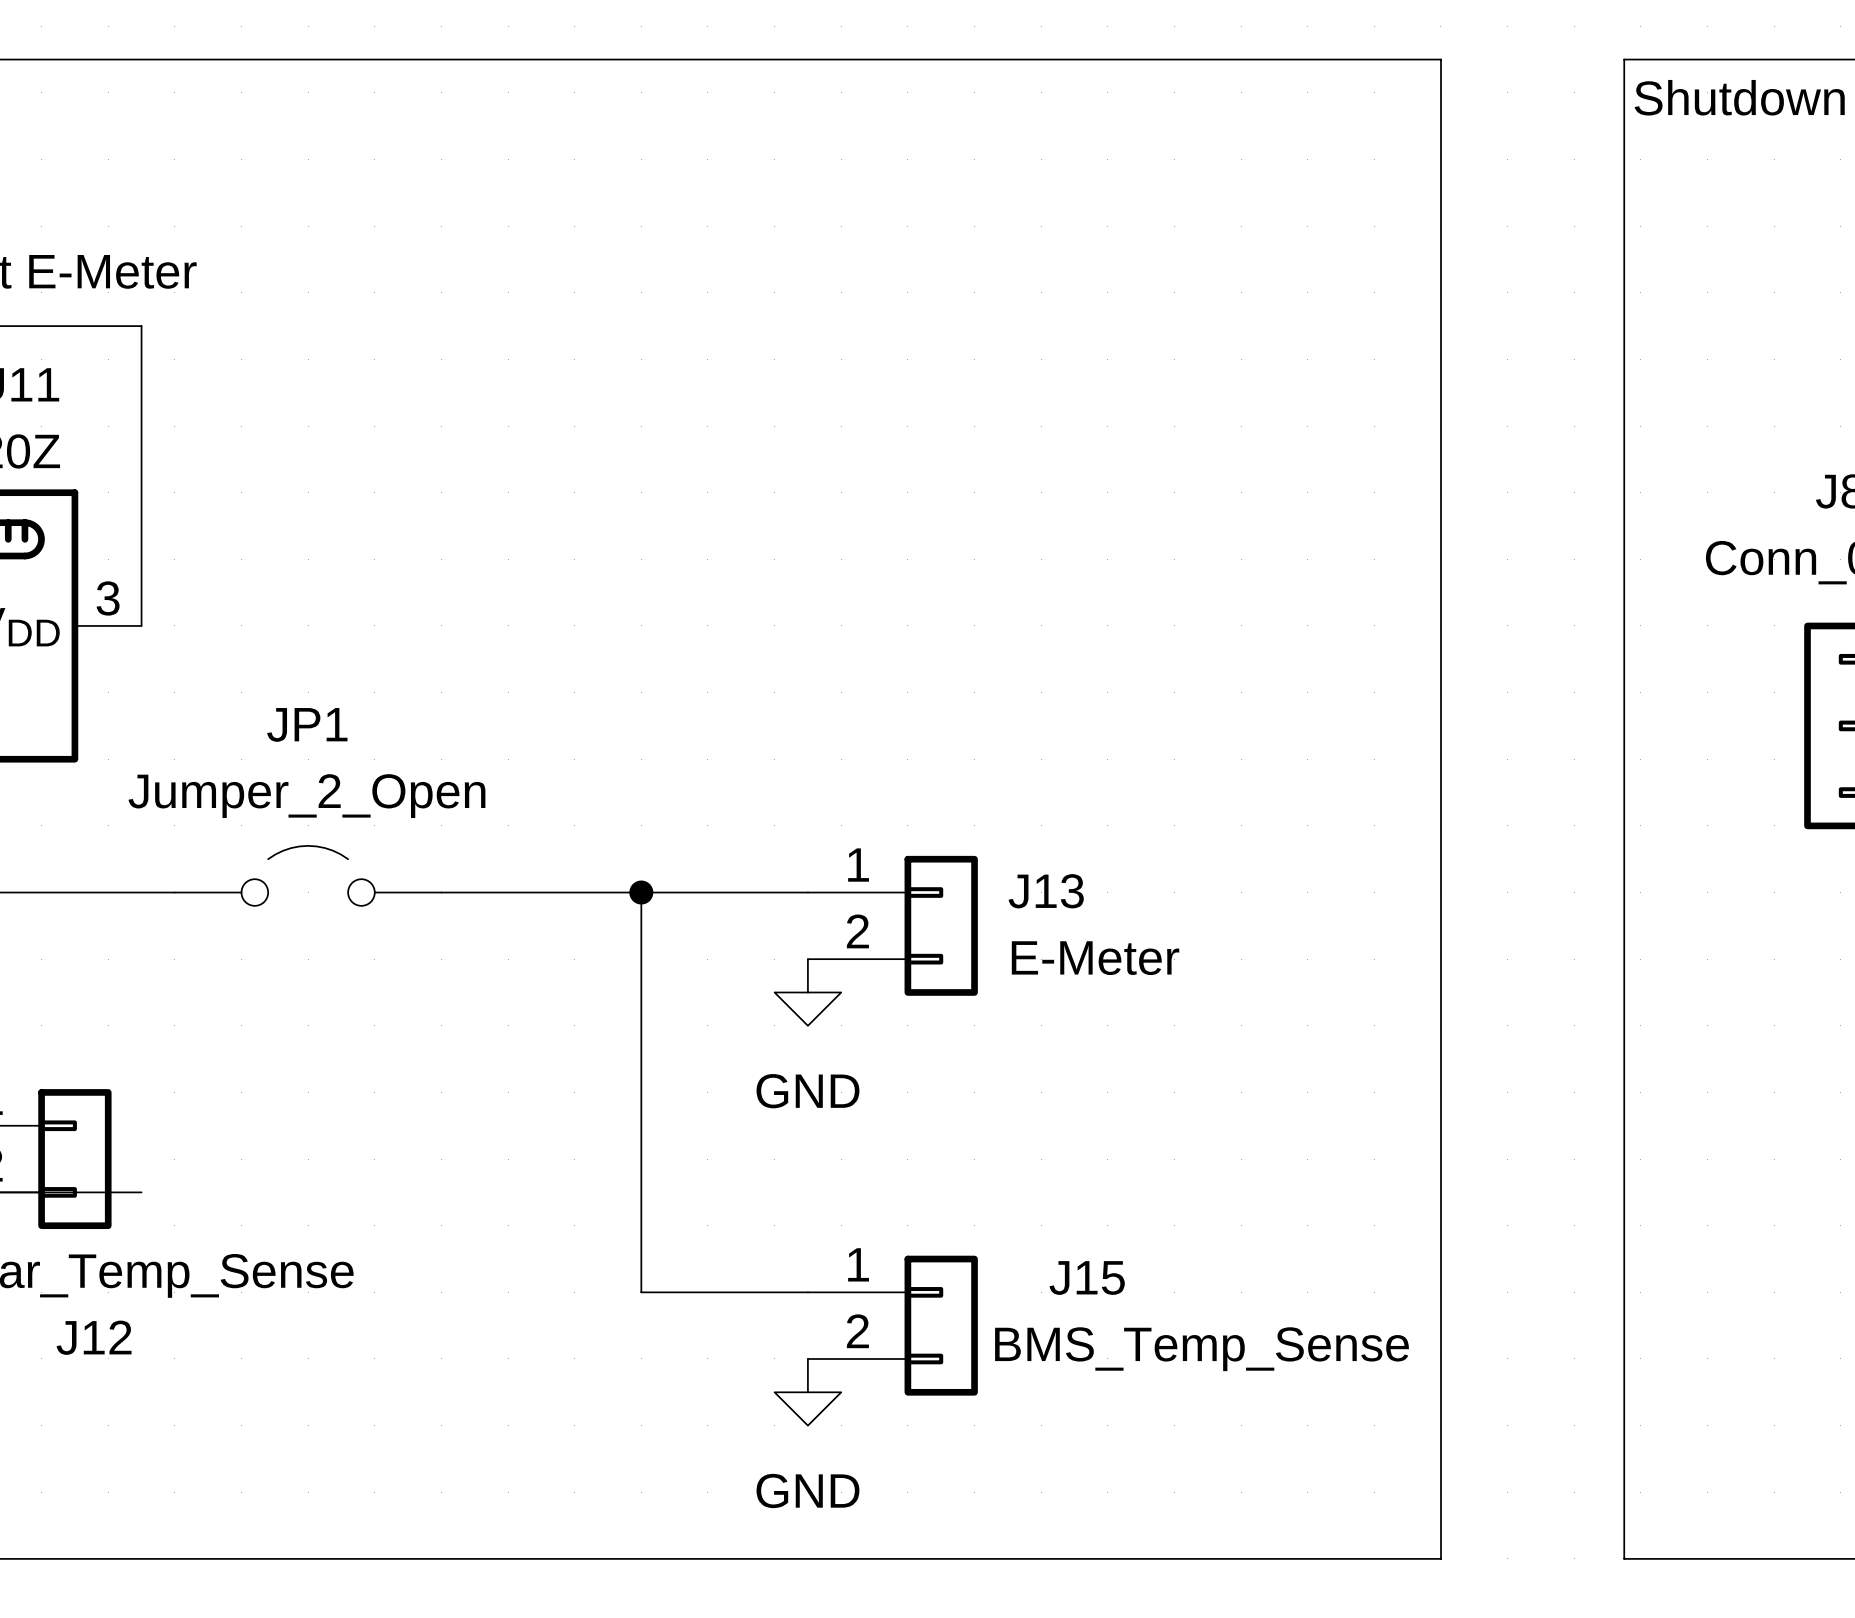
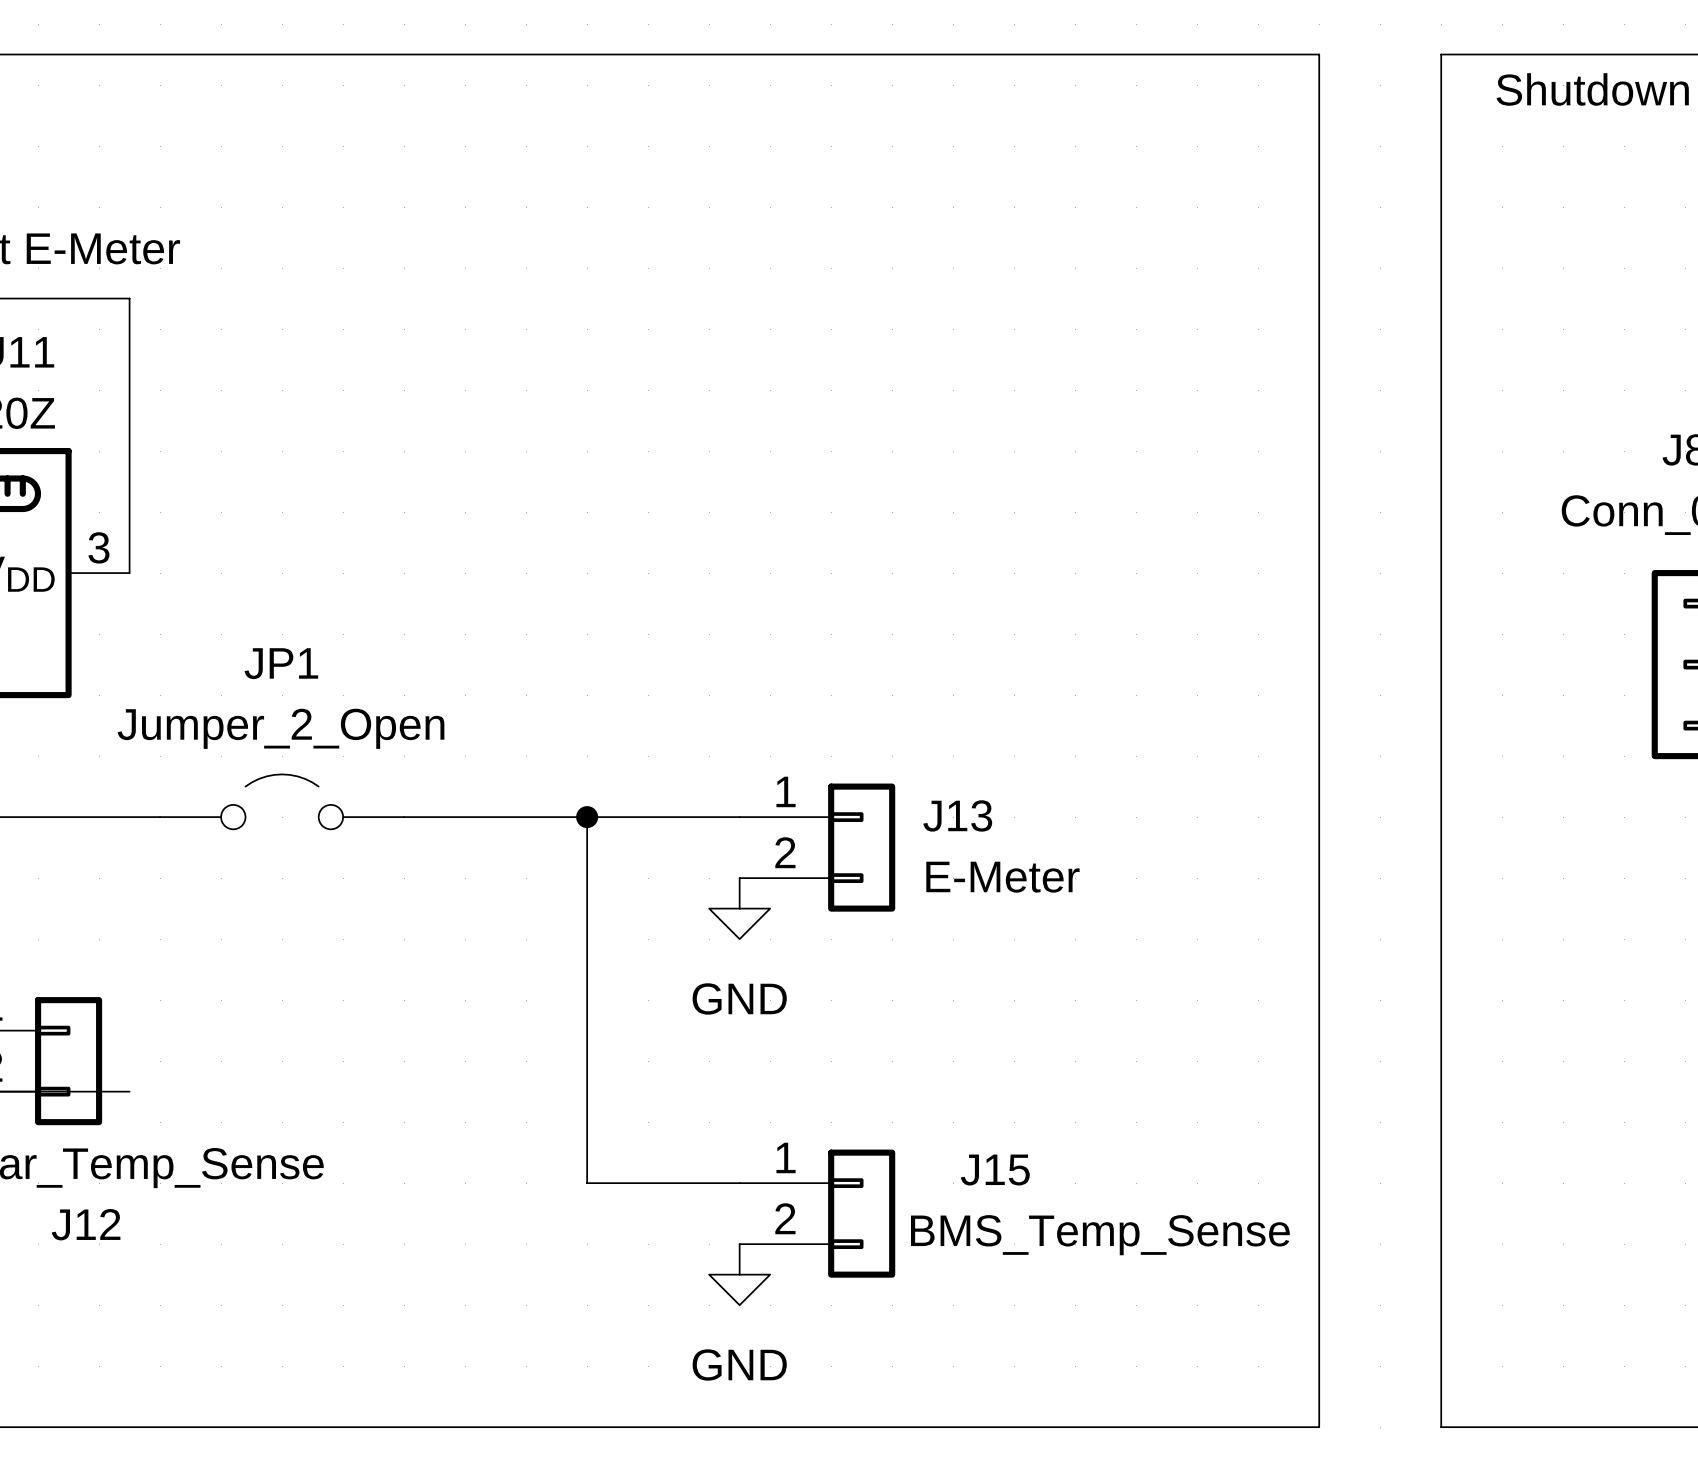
line: (1624, 59) (1624, 1558) -> (1486, 54) (1441, 54) (1441, 1427) (1486, 1427)

